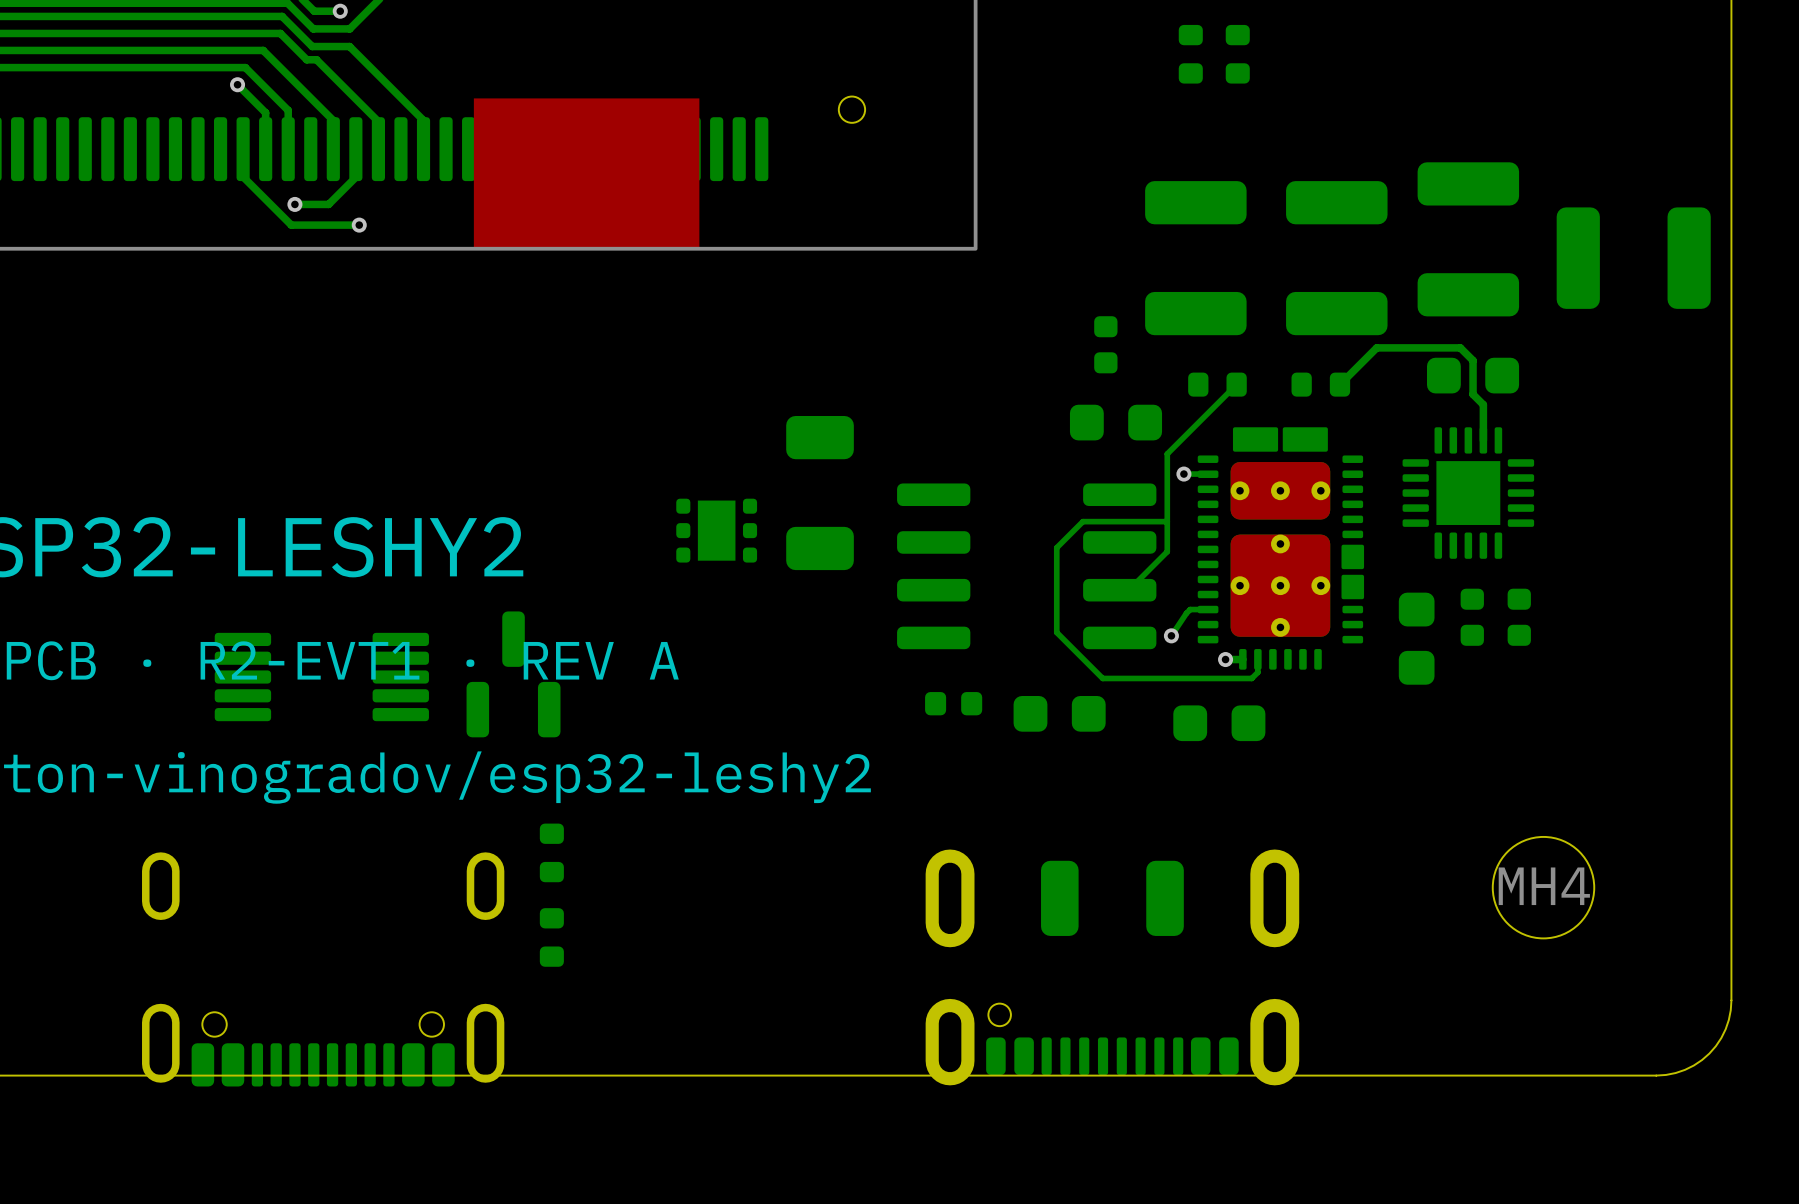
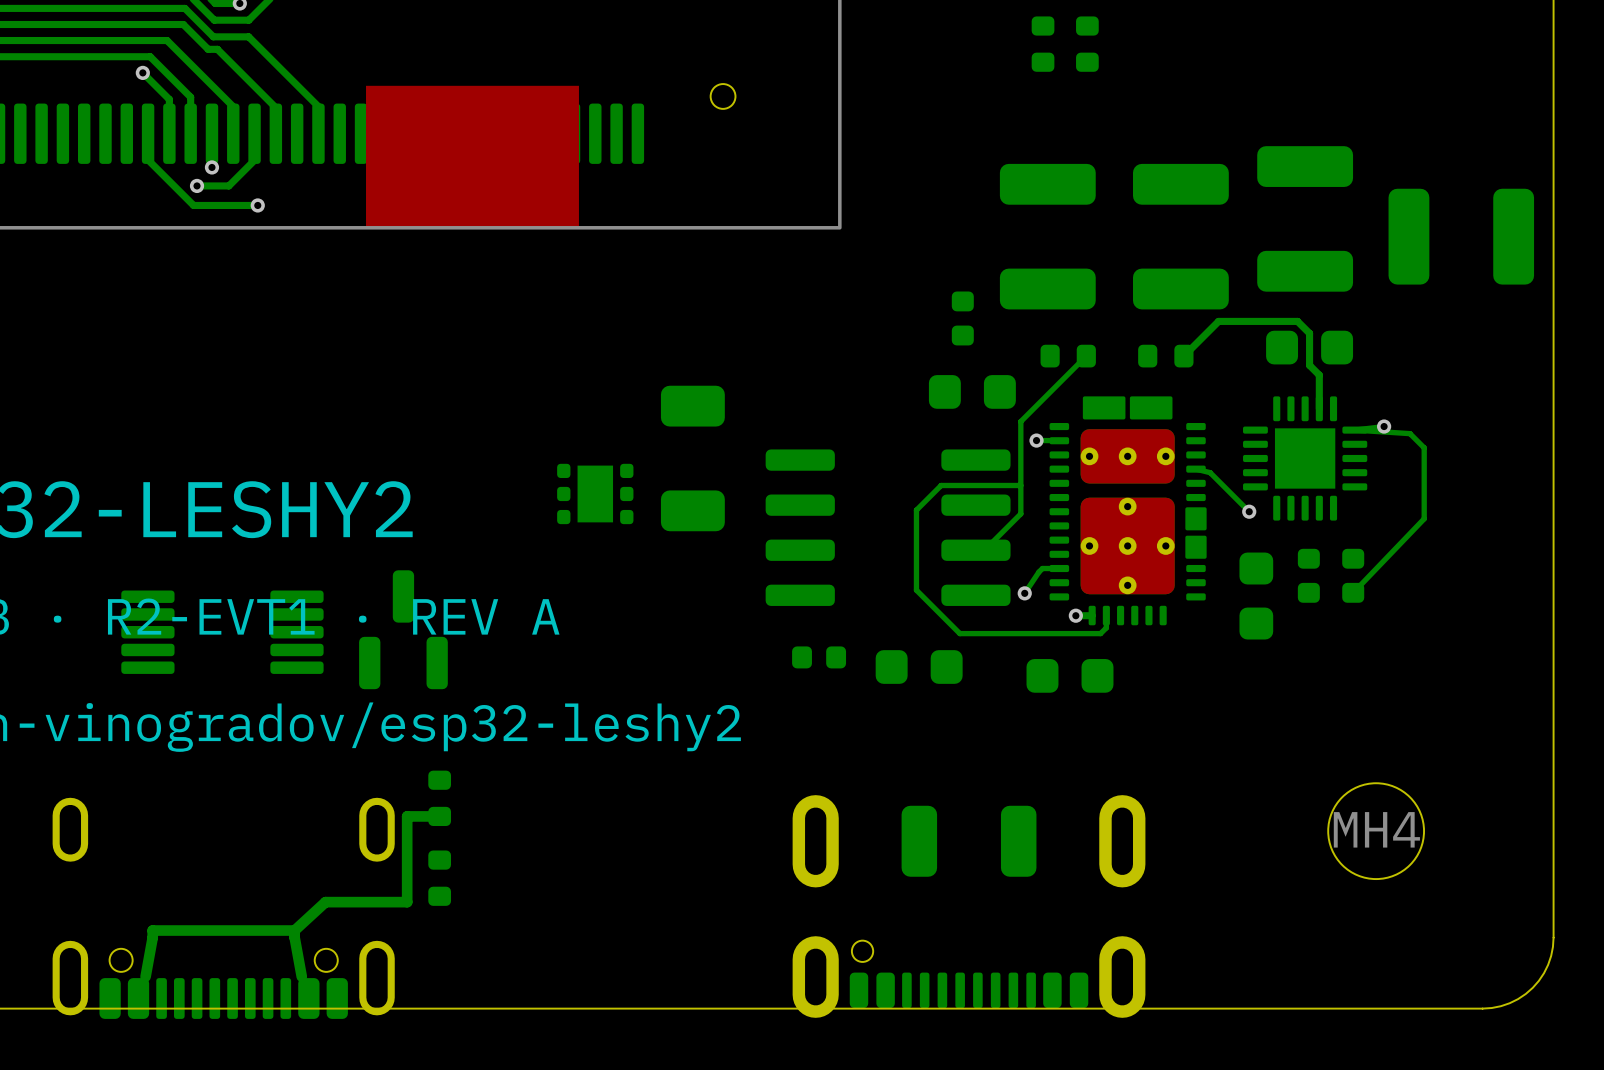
via: none -> (211, 167)
bottom track: none -> (1384, 426) (1354, 430) (1410, 433) (1424, 447) (1424, 518) (1353, 592)
via: none -> (1384, 426)
bottom track: none -> (1195, 469) (1210, 472) (1249, 511)
via: none -> (1249, 511)
bottom track: none -> (439, 816) (407, 816) (407, 902) (325, 902) (294, 930)
bottom track: none -> (294, 930) (152, 930) (145, 976)
bottom track: none -> (294, 930) (301, 976)

